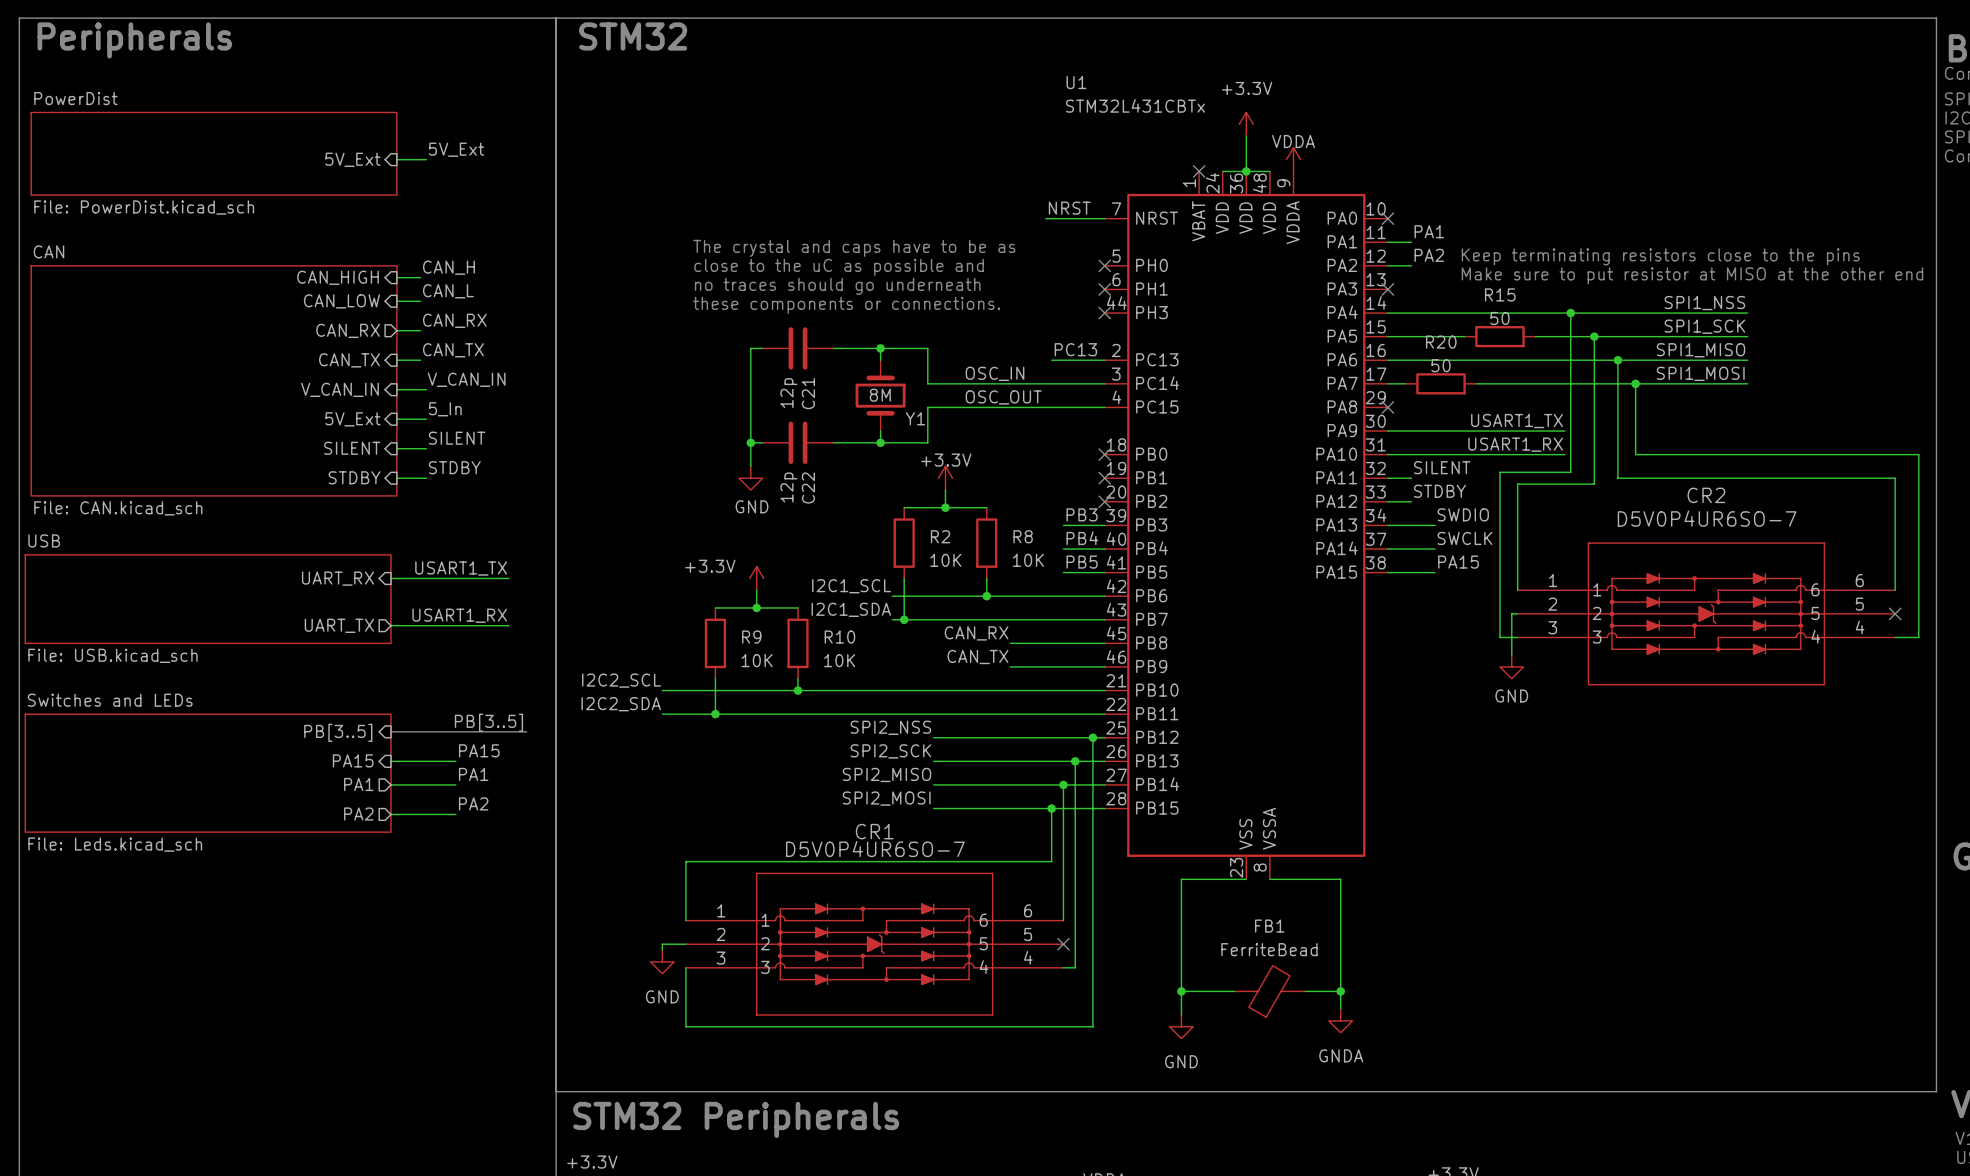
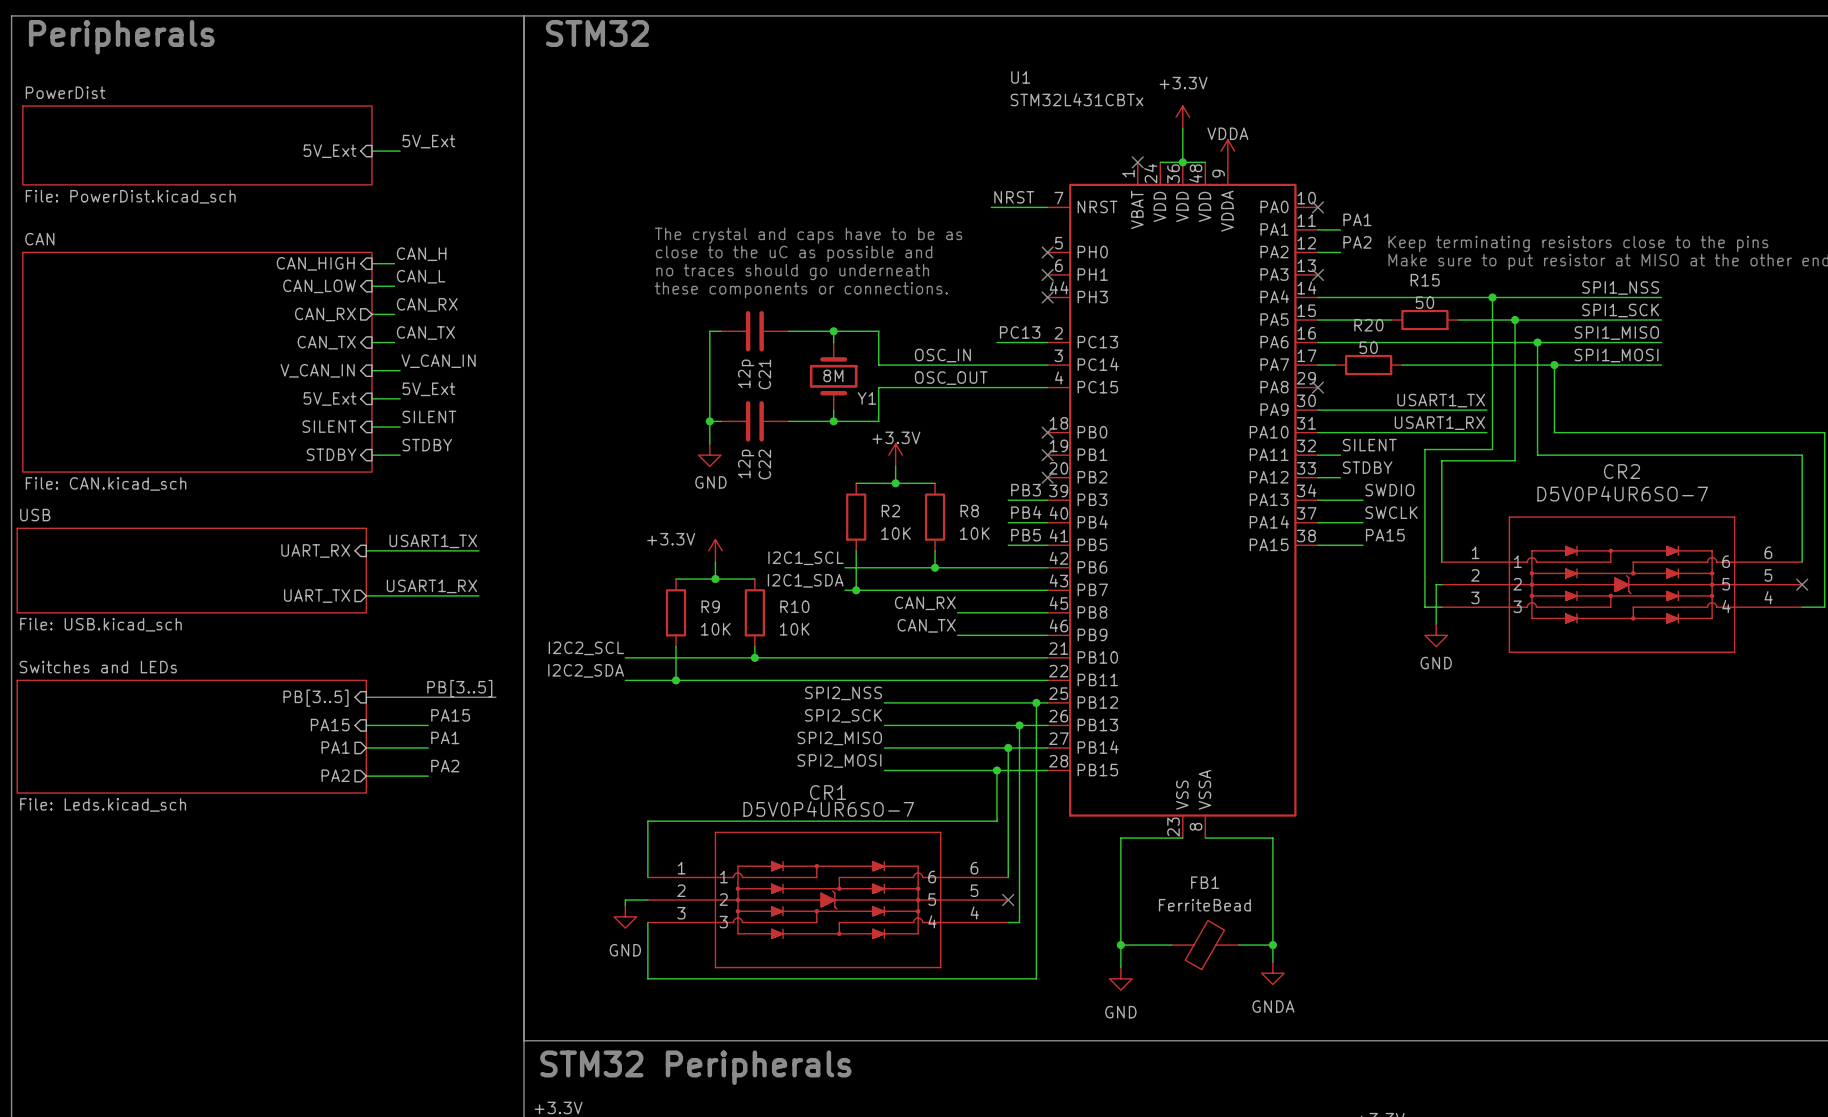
label: 5_In (445, 409) -> 5V_Ext (428, 389)

